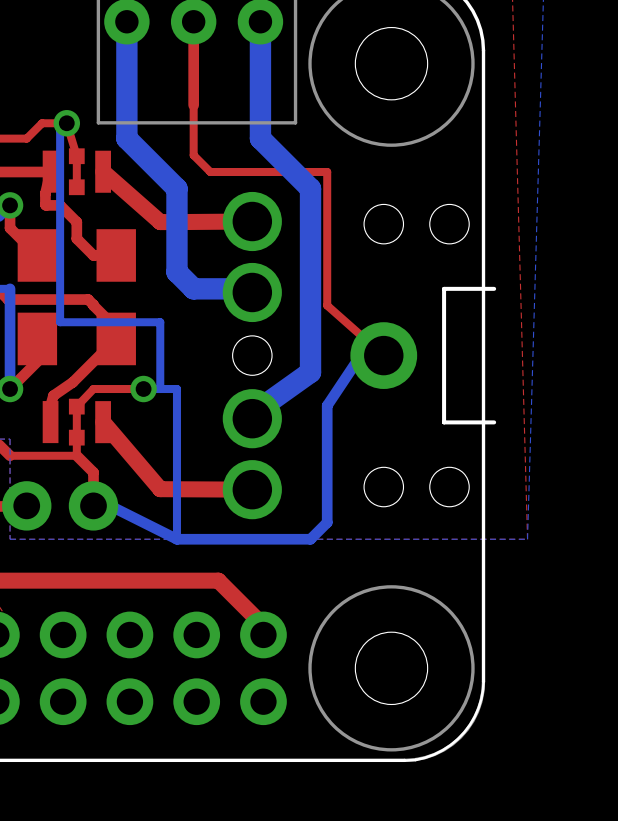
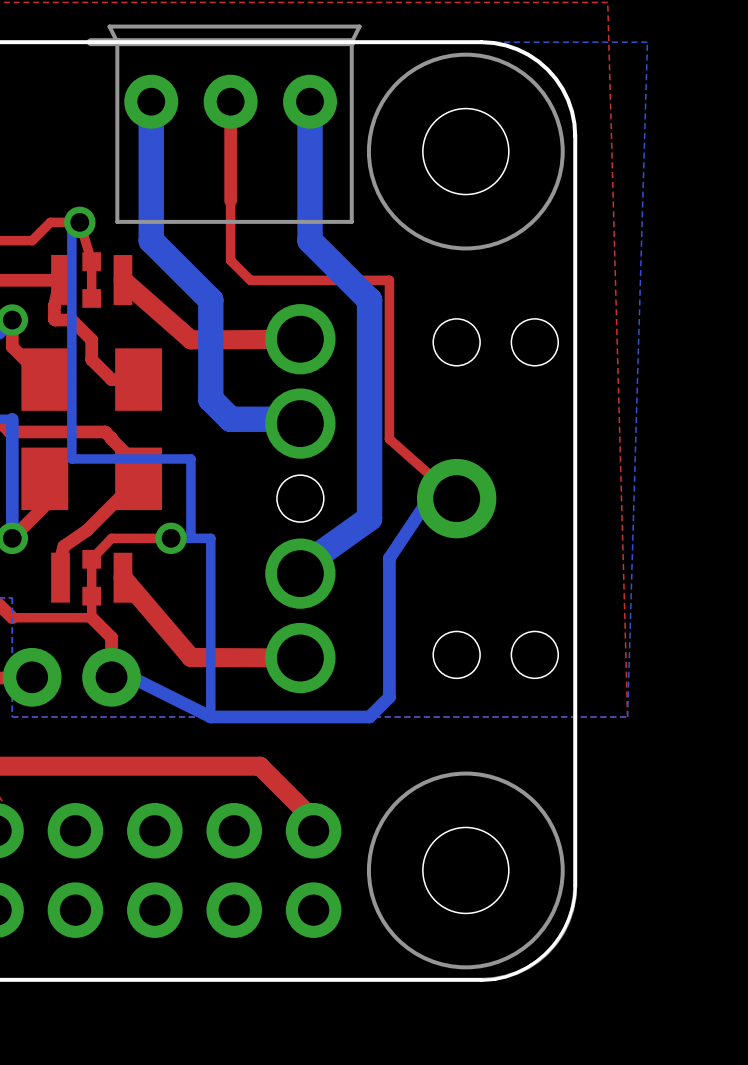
board edge: (494, 288) (444, 288) (444, 422) (494, 422) -> none

